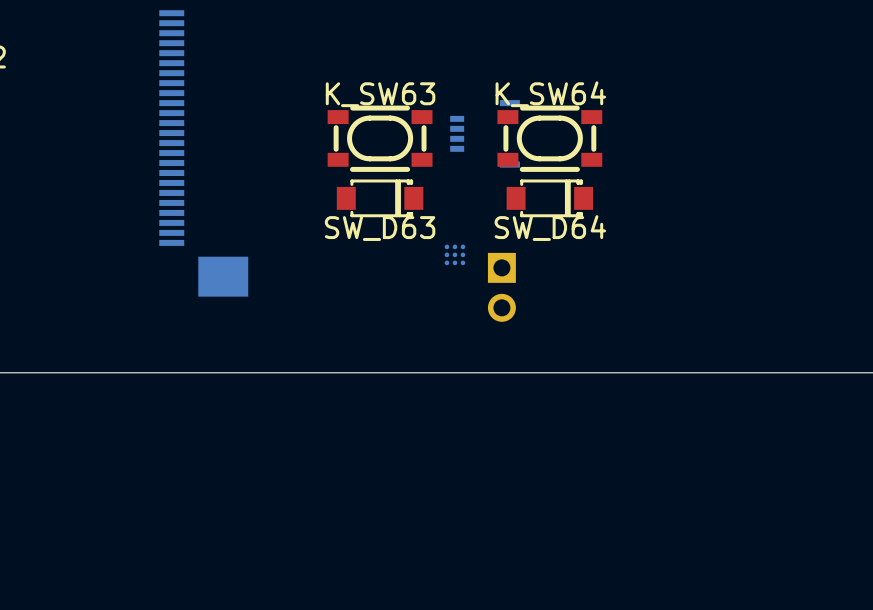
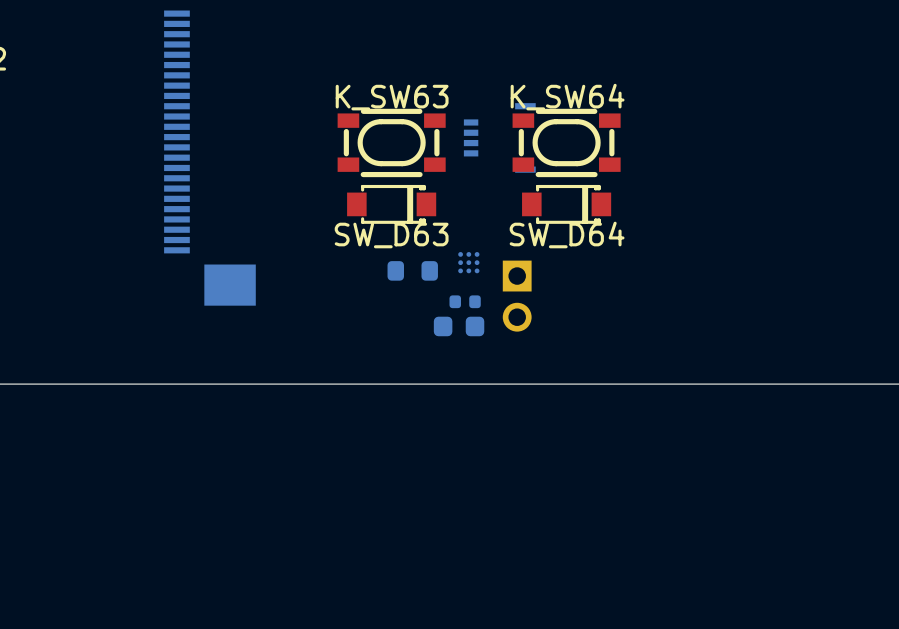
part: none -> (412, 270)
part: none -> (465, 301)
part: none -> (459, 326)

